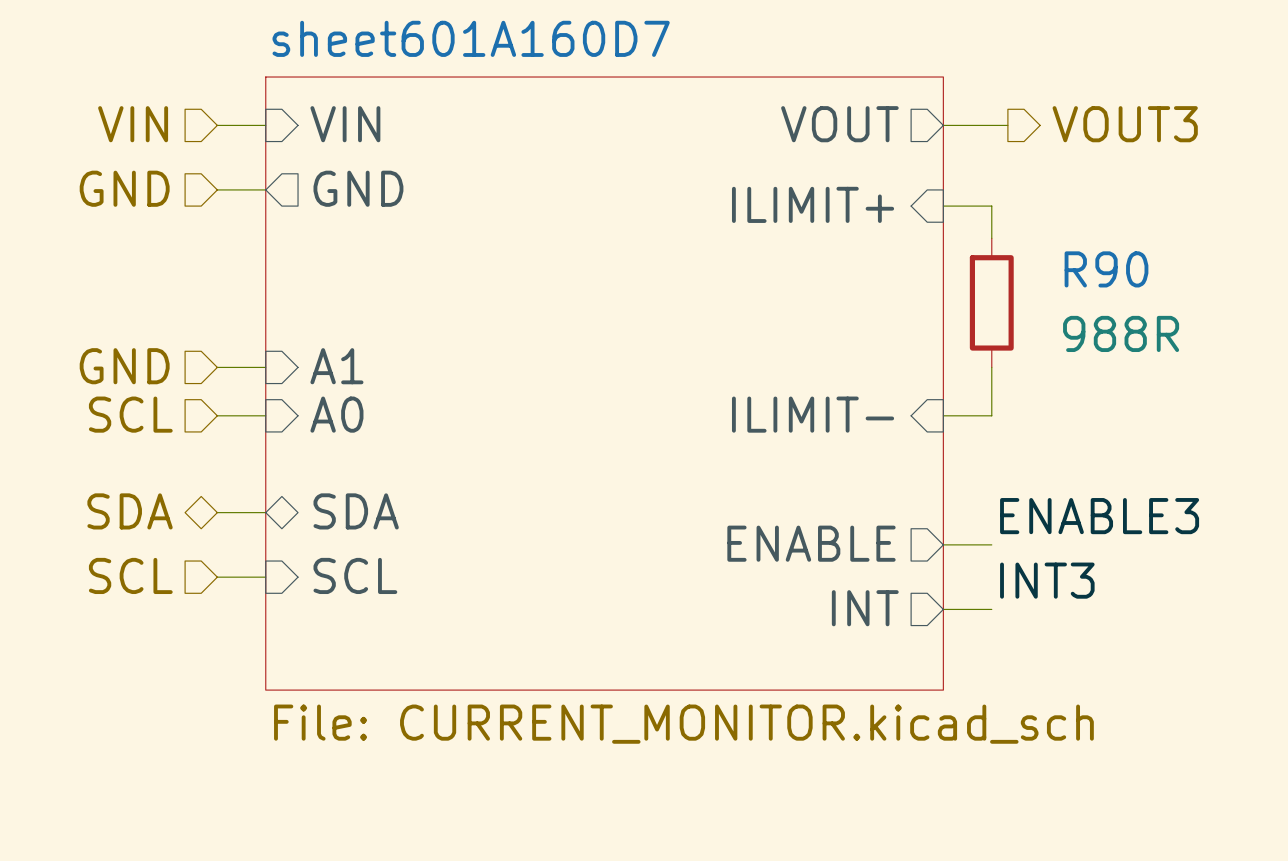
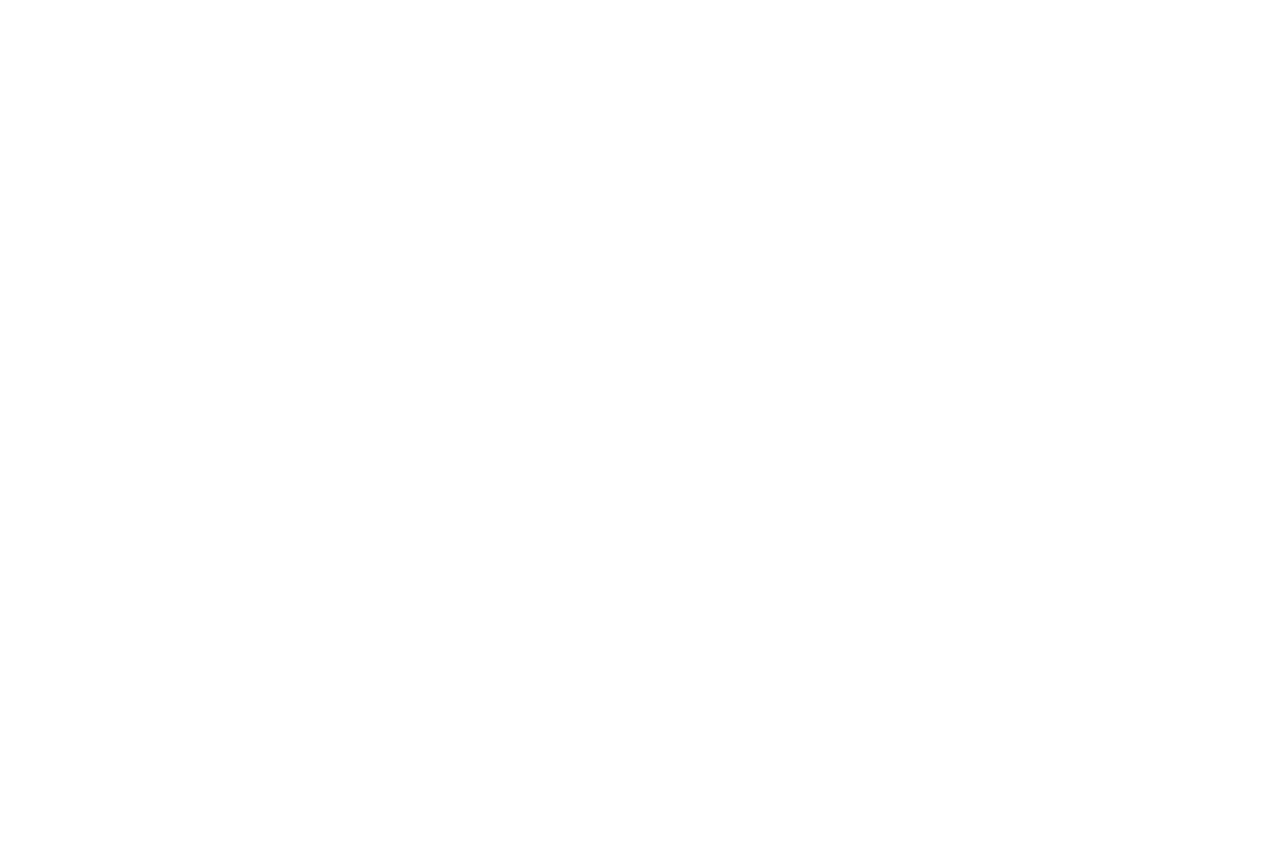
hierarchical label: VIN (133, 124) -> none
sheet pin: VIN (345, 124) -> none
sheet pin: VOUT (839, 124) -> none
hierarchical label: VOUT3 (1125, 124) -> none
wire: (217, 125) (265, 125) -> none
wire: (943, 125) (1007, 125) -> none
hierarchical label: GND (124, 188) -> none
sheet pin: GND (358, 188) -> none
wire: (217, 189) (265, 189) -> none
sheet pin: ILIMIT+ (813, 204) -> none
wire: (943, 206) (991, 206) (991, 238) -> none
R90: 988R (991, 302) -> none
hierarchical label: GND (124, 366) -> none
sheet pin: A1 (336, 366) -> none
wire: (217, 367) (265, 367) -> none
wire: (991, 367) (991, 415) (943, 415) -> none
sheet sheet601A160D7: File: CURRENT_MONITOR.kicad_sch (604, 383) -> none
hierarchical label: SCL (130, 414) -> none
sheet pin: A0 (336, 414) -> none
sheet pin: ILIMIT- (813, 414) -> none
wire: (217, 415) (265, 415) -> none
hierarchical label: SDA (130, 511) -> none
sheet pin: SDA (356, 511) -> none
wire: (217, 512) (265, 512) -> none
label: ENABLE3 (1099, 516) -> none
sheet pin: ENABLE (811, 543) -> none
wire: (943, 544) (991, 544) -> none
hierarchical label: SCL (130, 575) -> none
sheet pin: SCL (355, 575) -> none
wire: (217, 577) (265, 577) -> none
label: INT3 (1047, 580) -> none
sheet pin: INT (865, 608) -> none
wire: (943, 609) (991, 609) -> none

